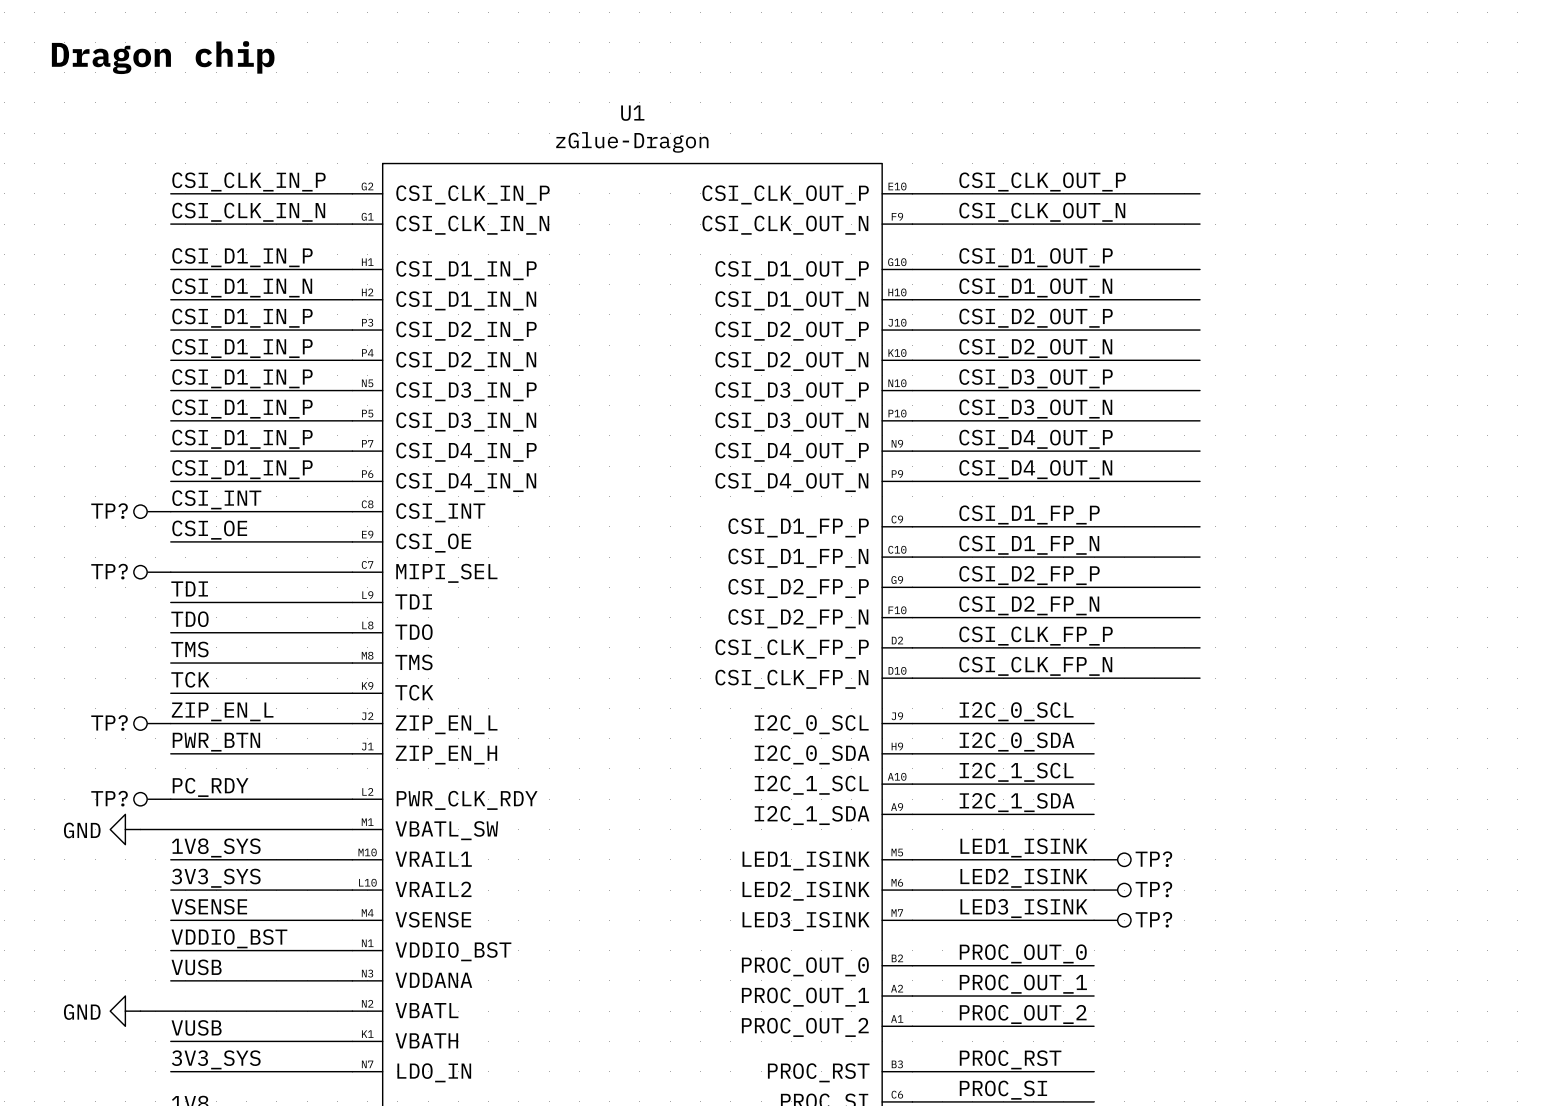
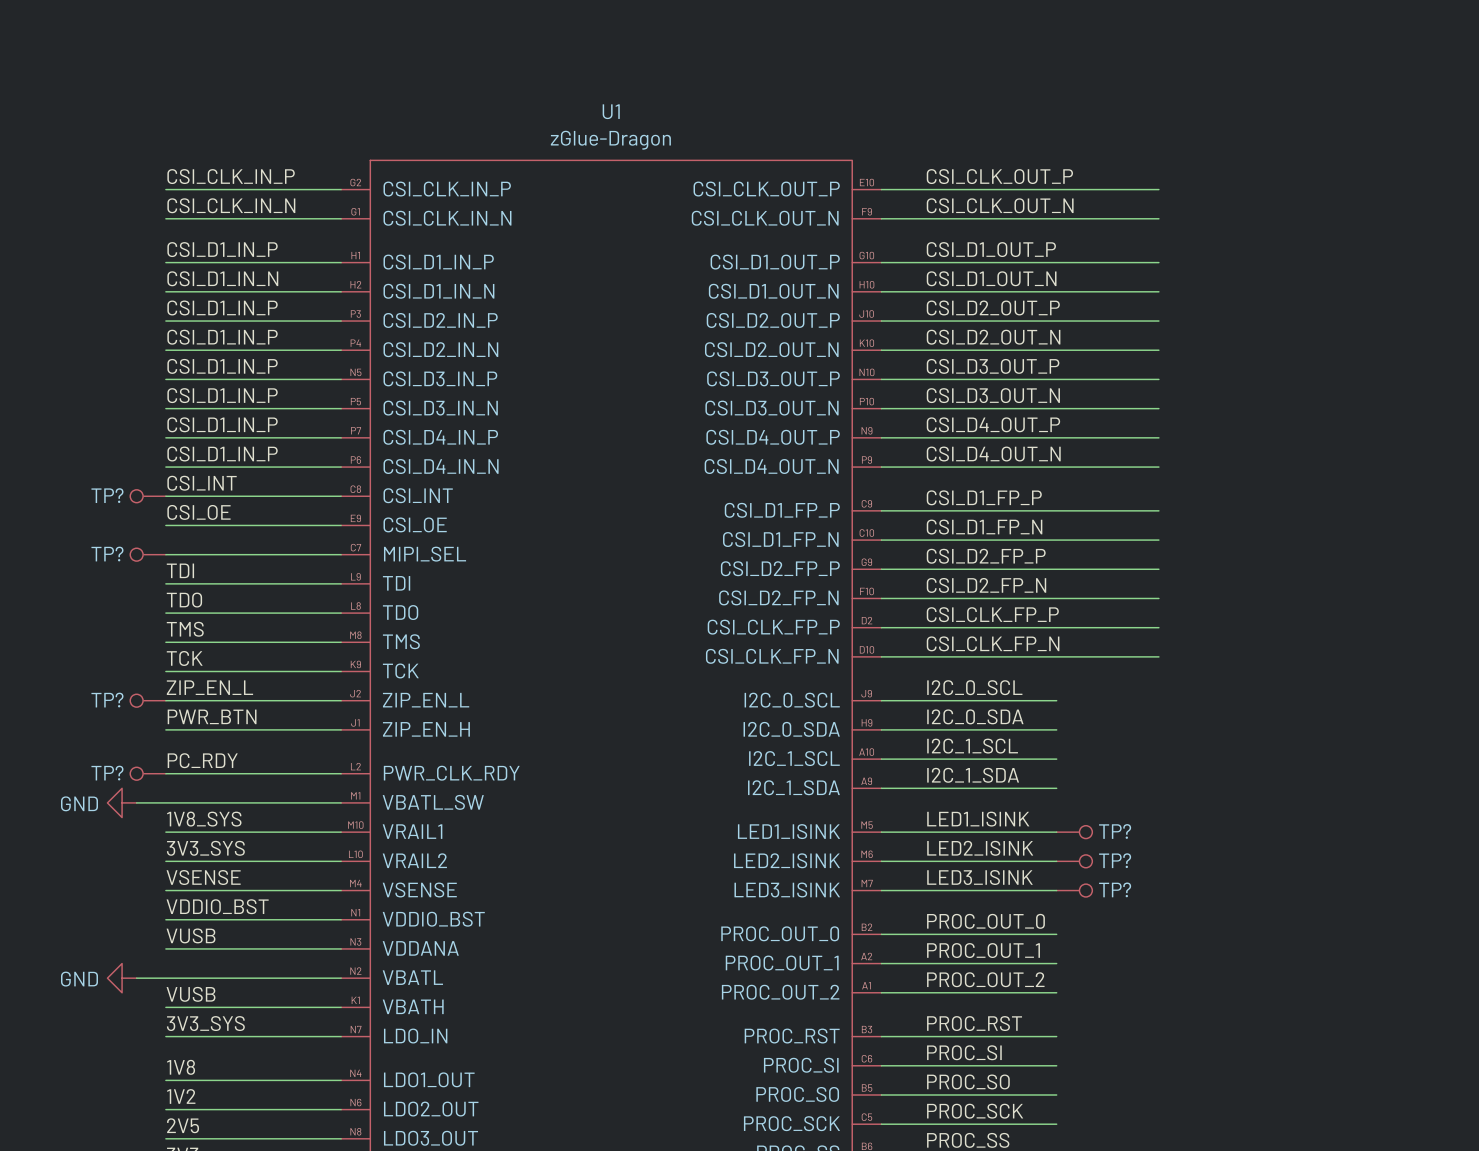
text: Dragon chip (163, 57) -> none

